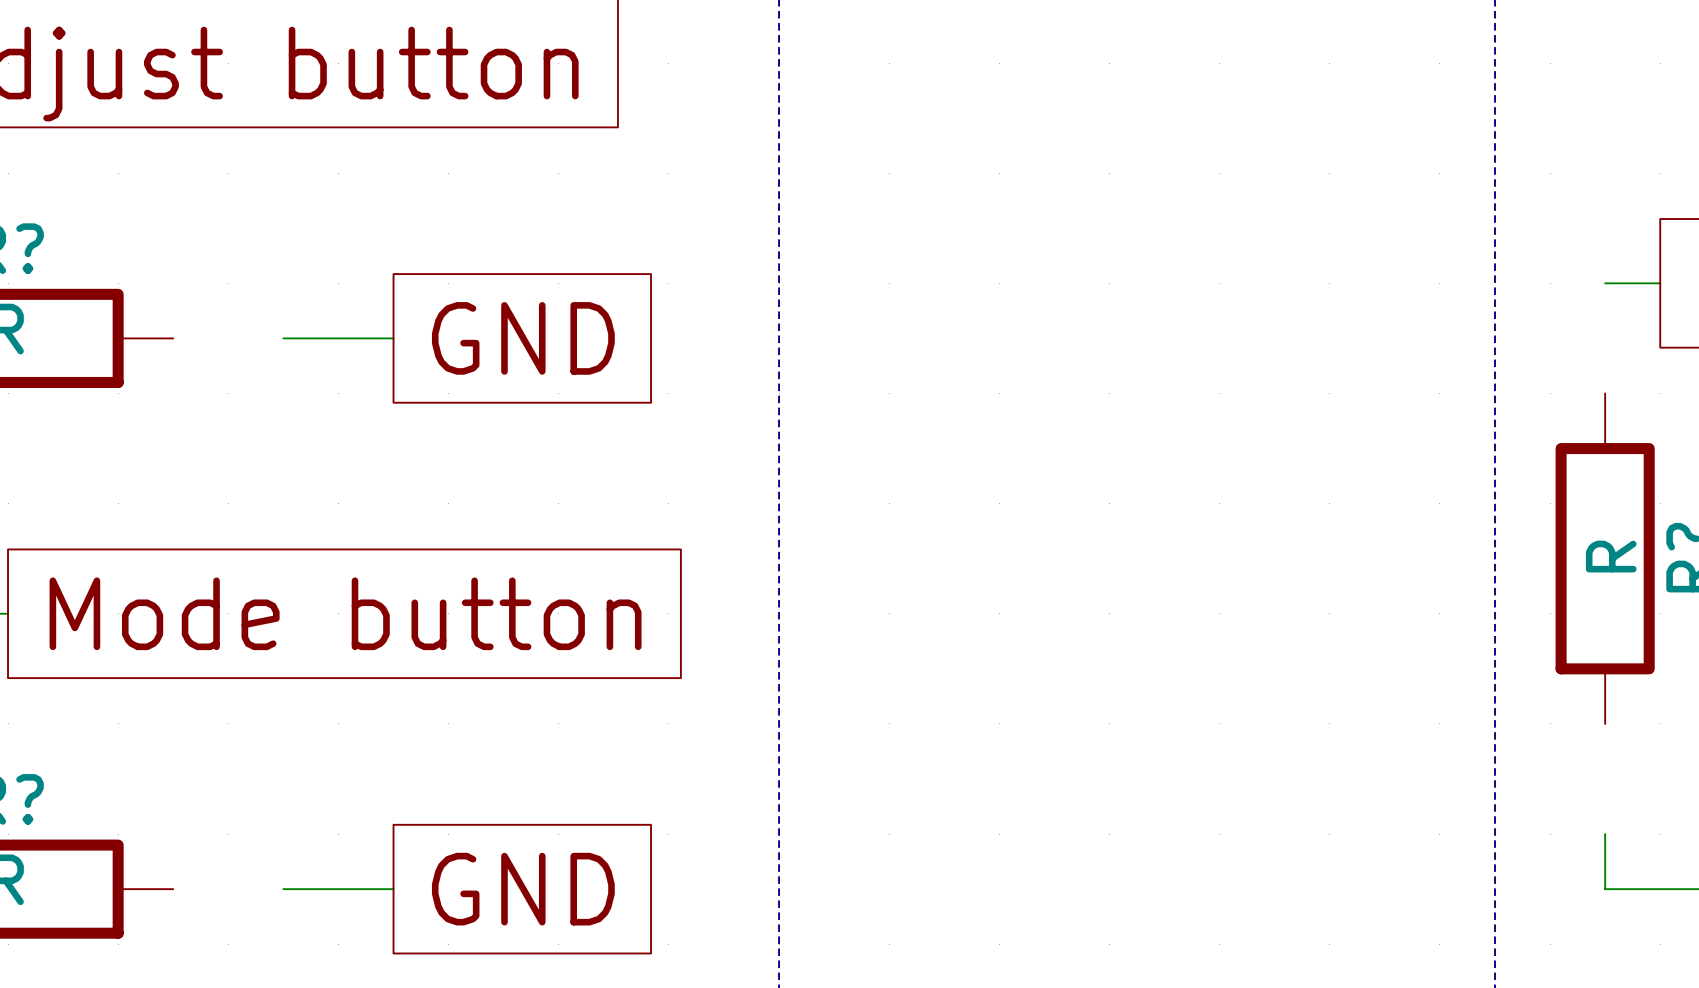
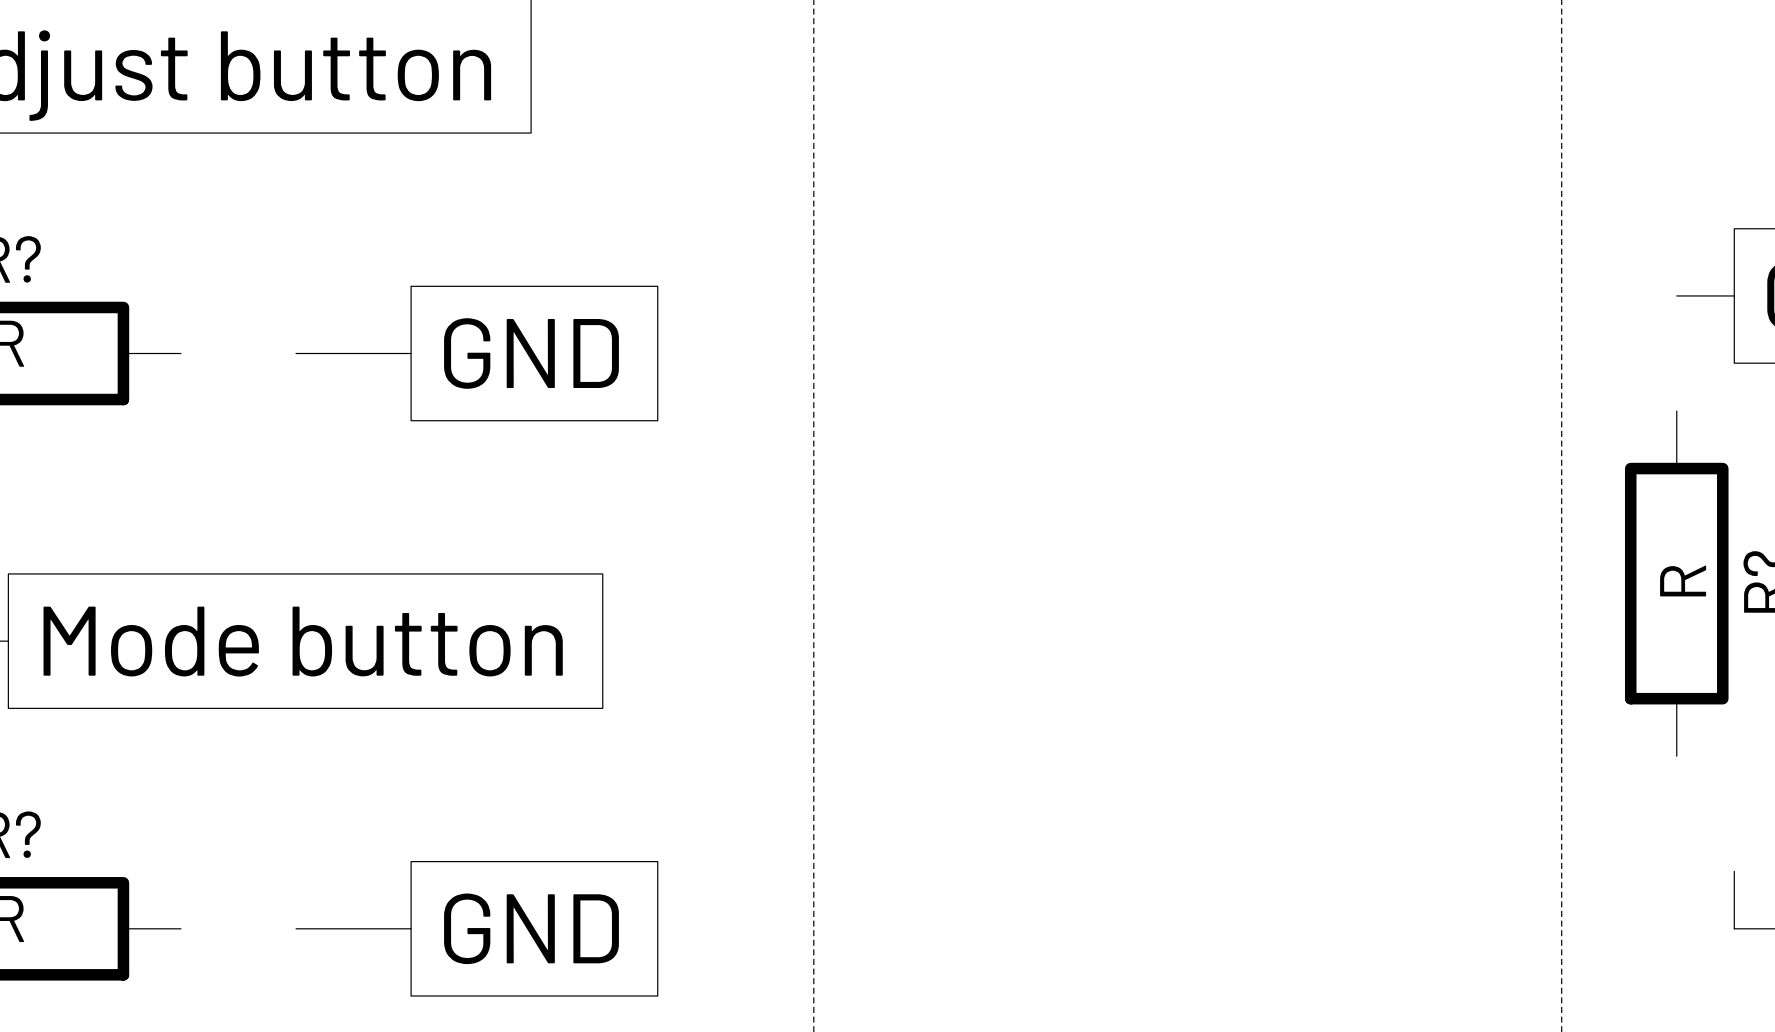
wire: (1605, 834) (1605, 889) (1660, 889) -> (1734, 871) (1734, 928)

